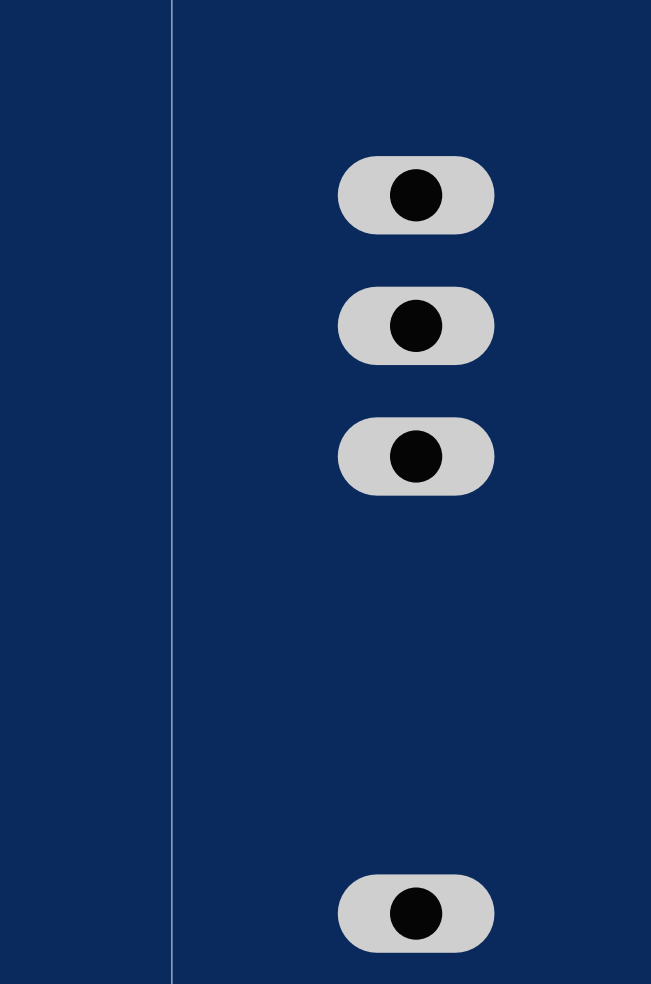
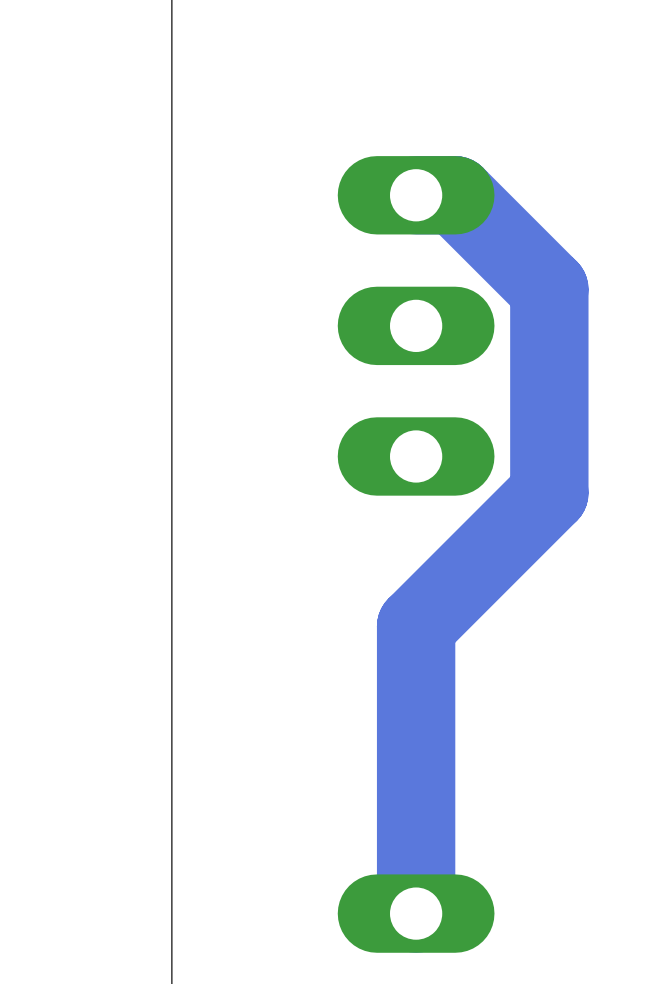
track: none -> (416, 195) (455, 195) (549, 289) (549, 493) (416, 626) (416, 913)

